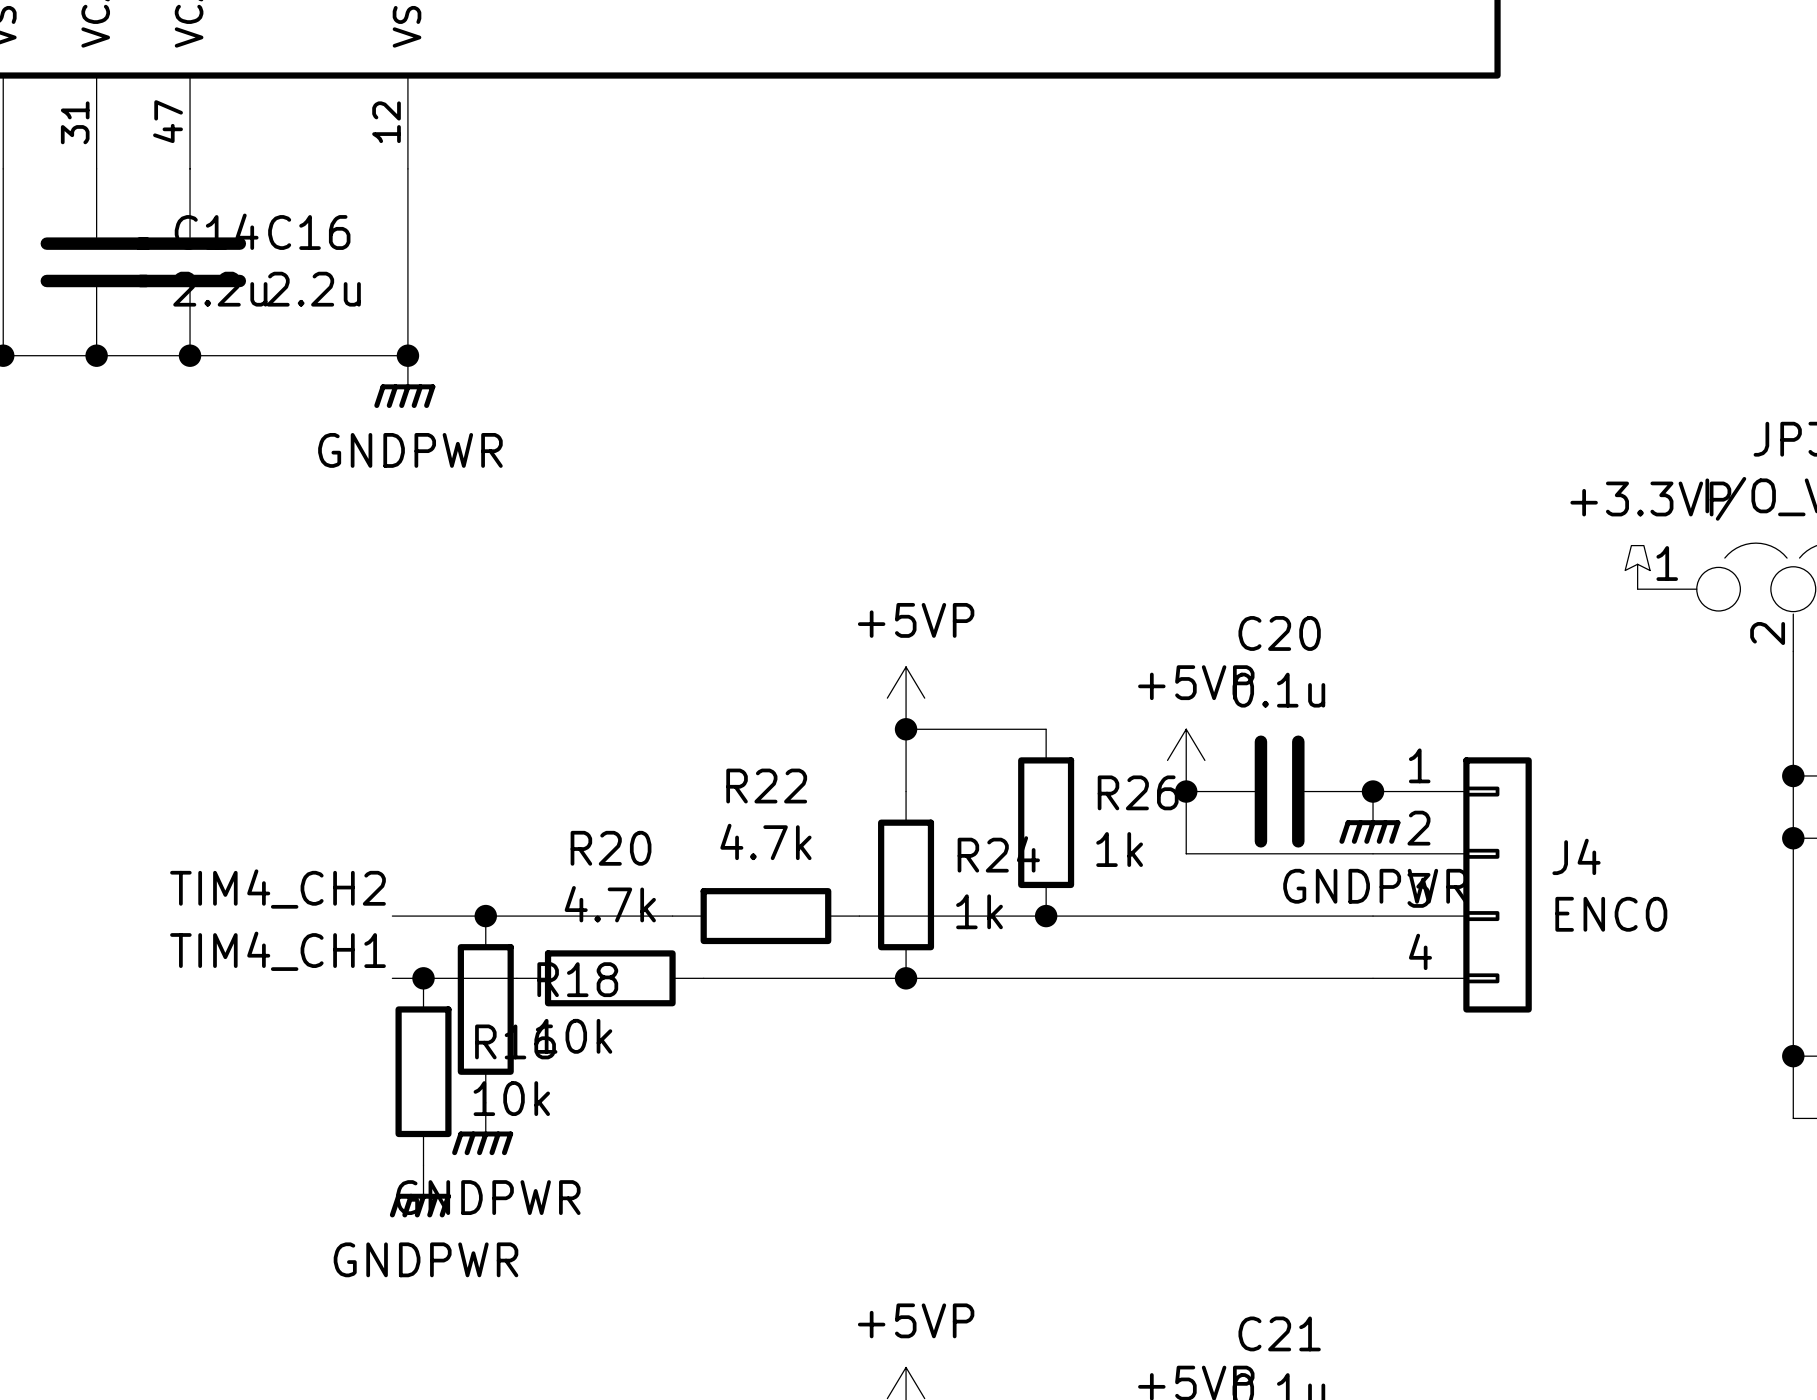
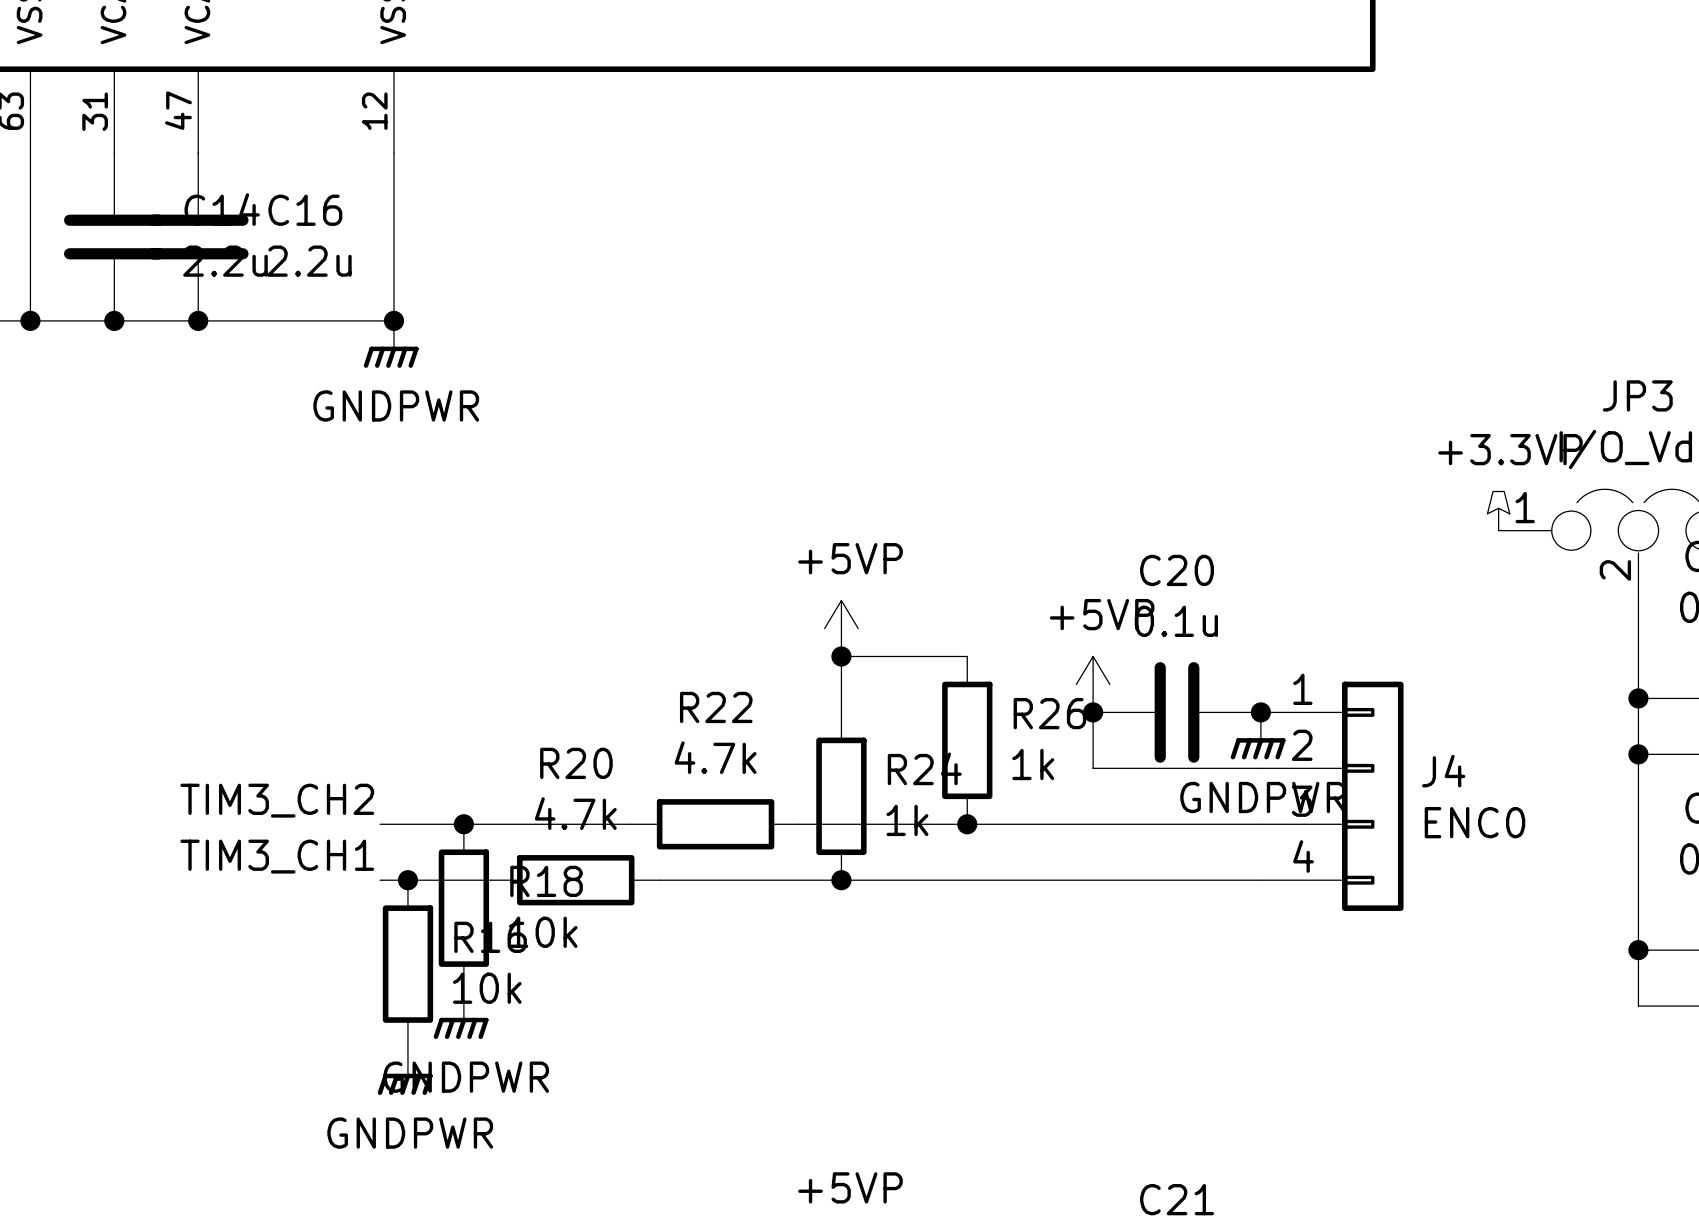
label: TIM4_CH2 (277, 889) -> TIM3_CH2 (277, 800)
label: TIM4_CH1 (277, 951) -> TIM3_CH1 (277, 856)

